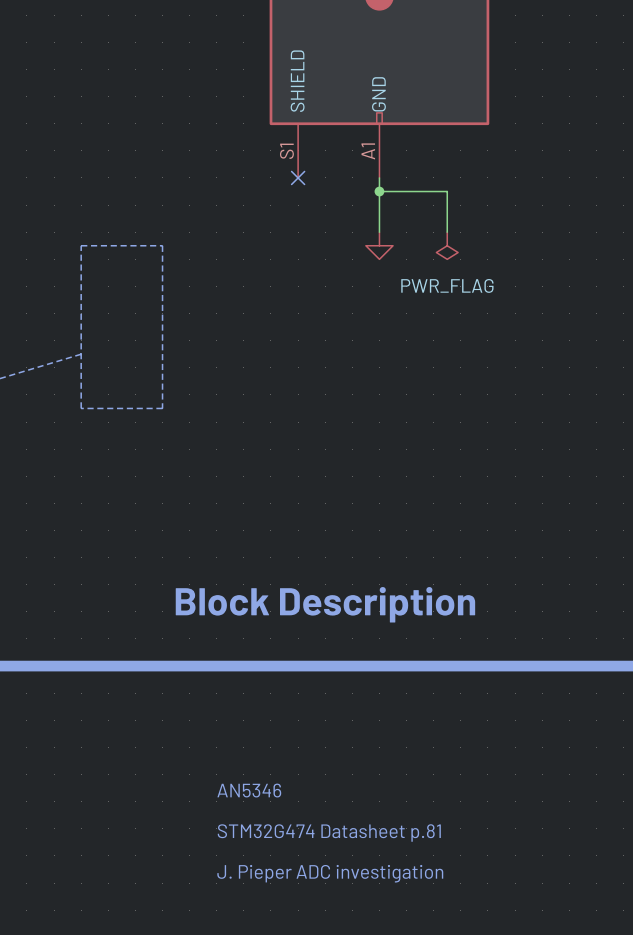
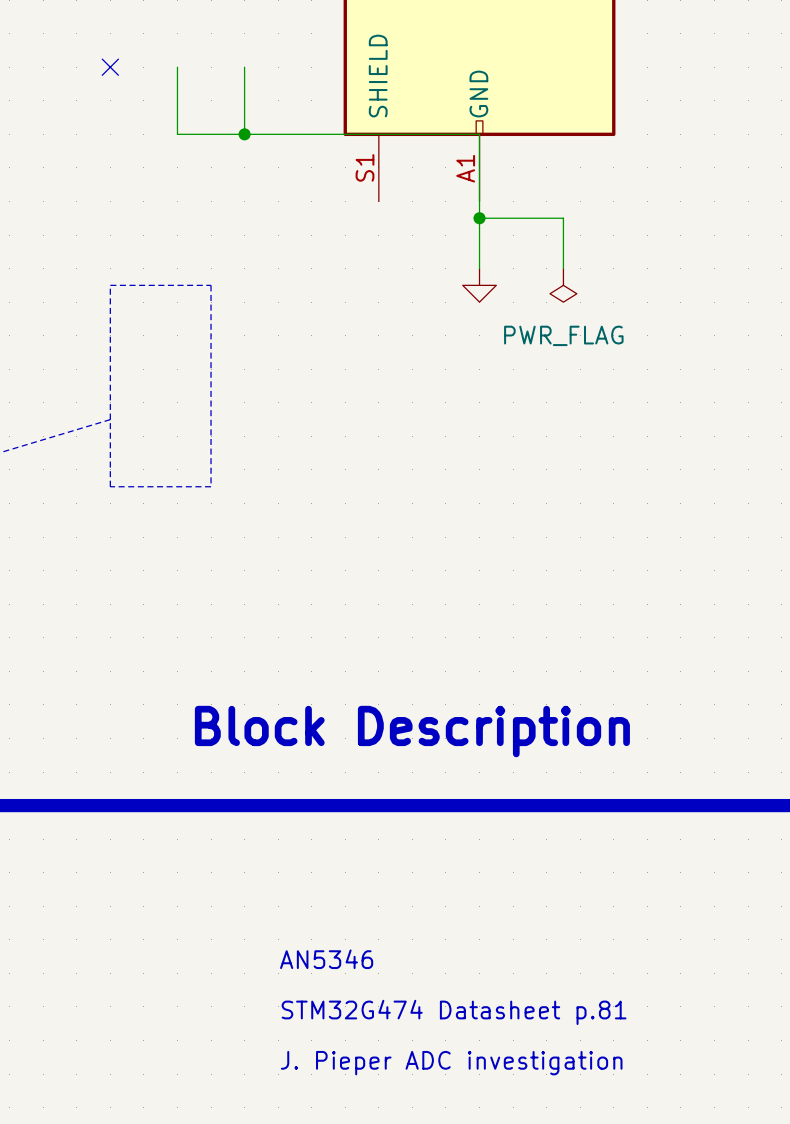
no-connect mark: none -> (110, 67)
wire: none -> (177, 67) (177, 134) (479, 134) (479, 201)
wire: none -> (244, 67) (244, 134)
junction: none -> (244, 134)
no-connect mark: (298, 177) -> none

